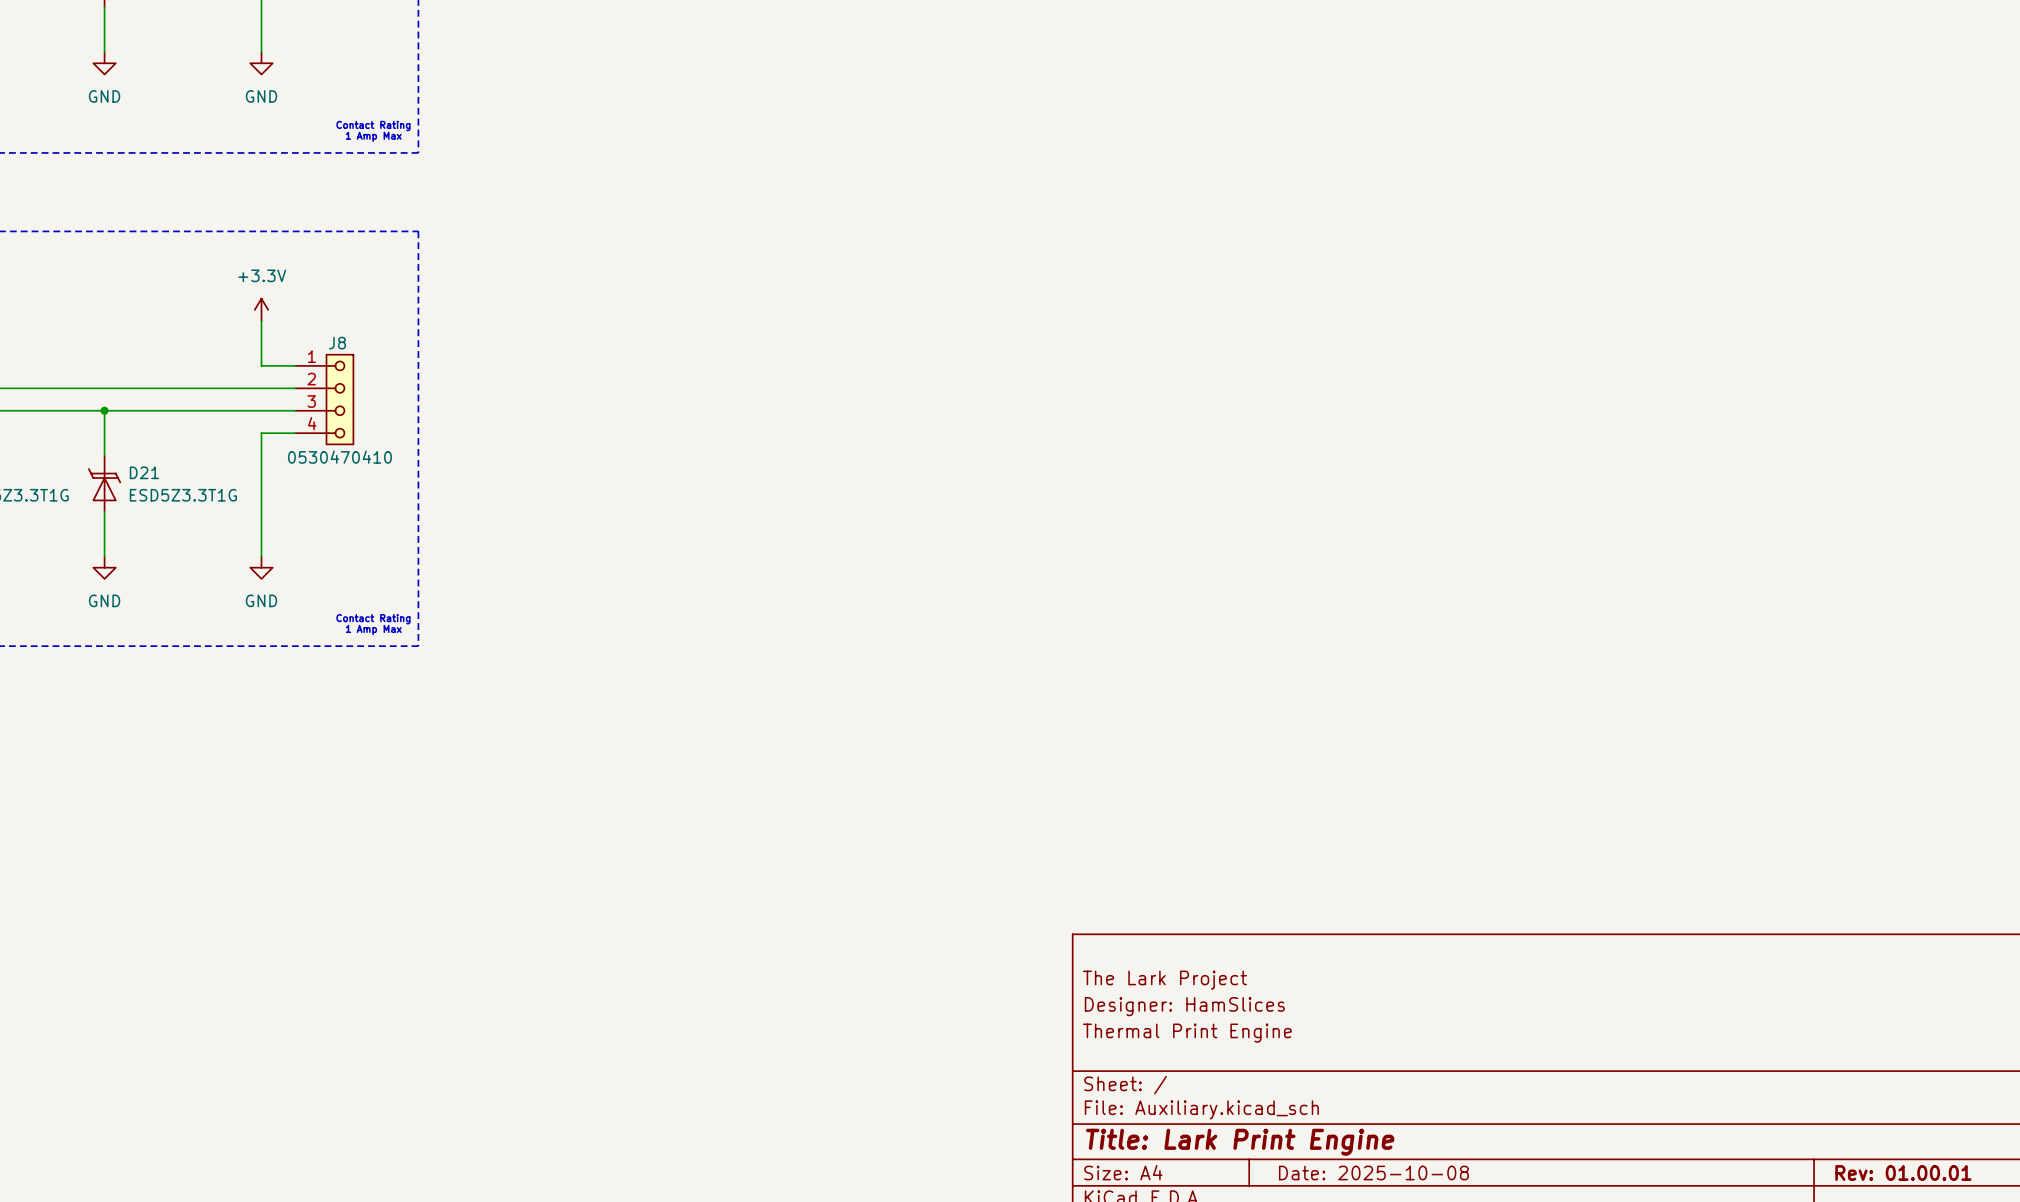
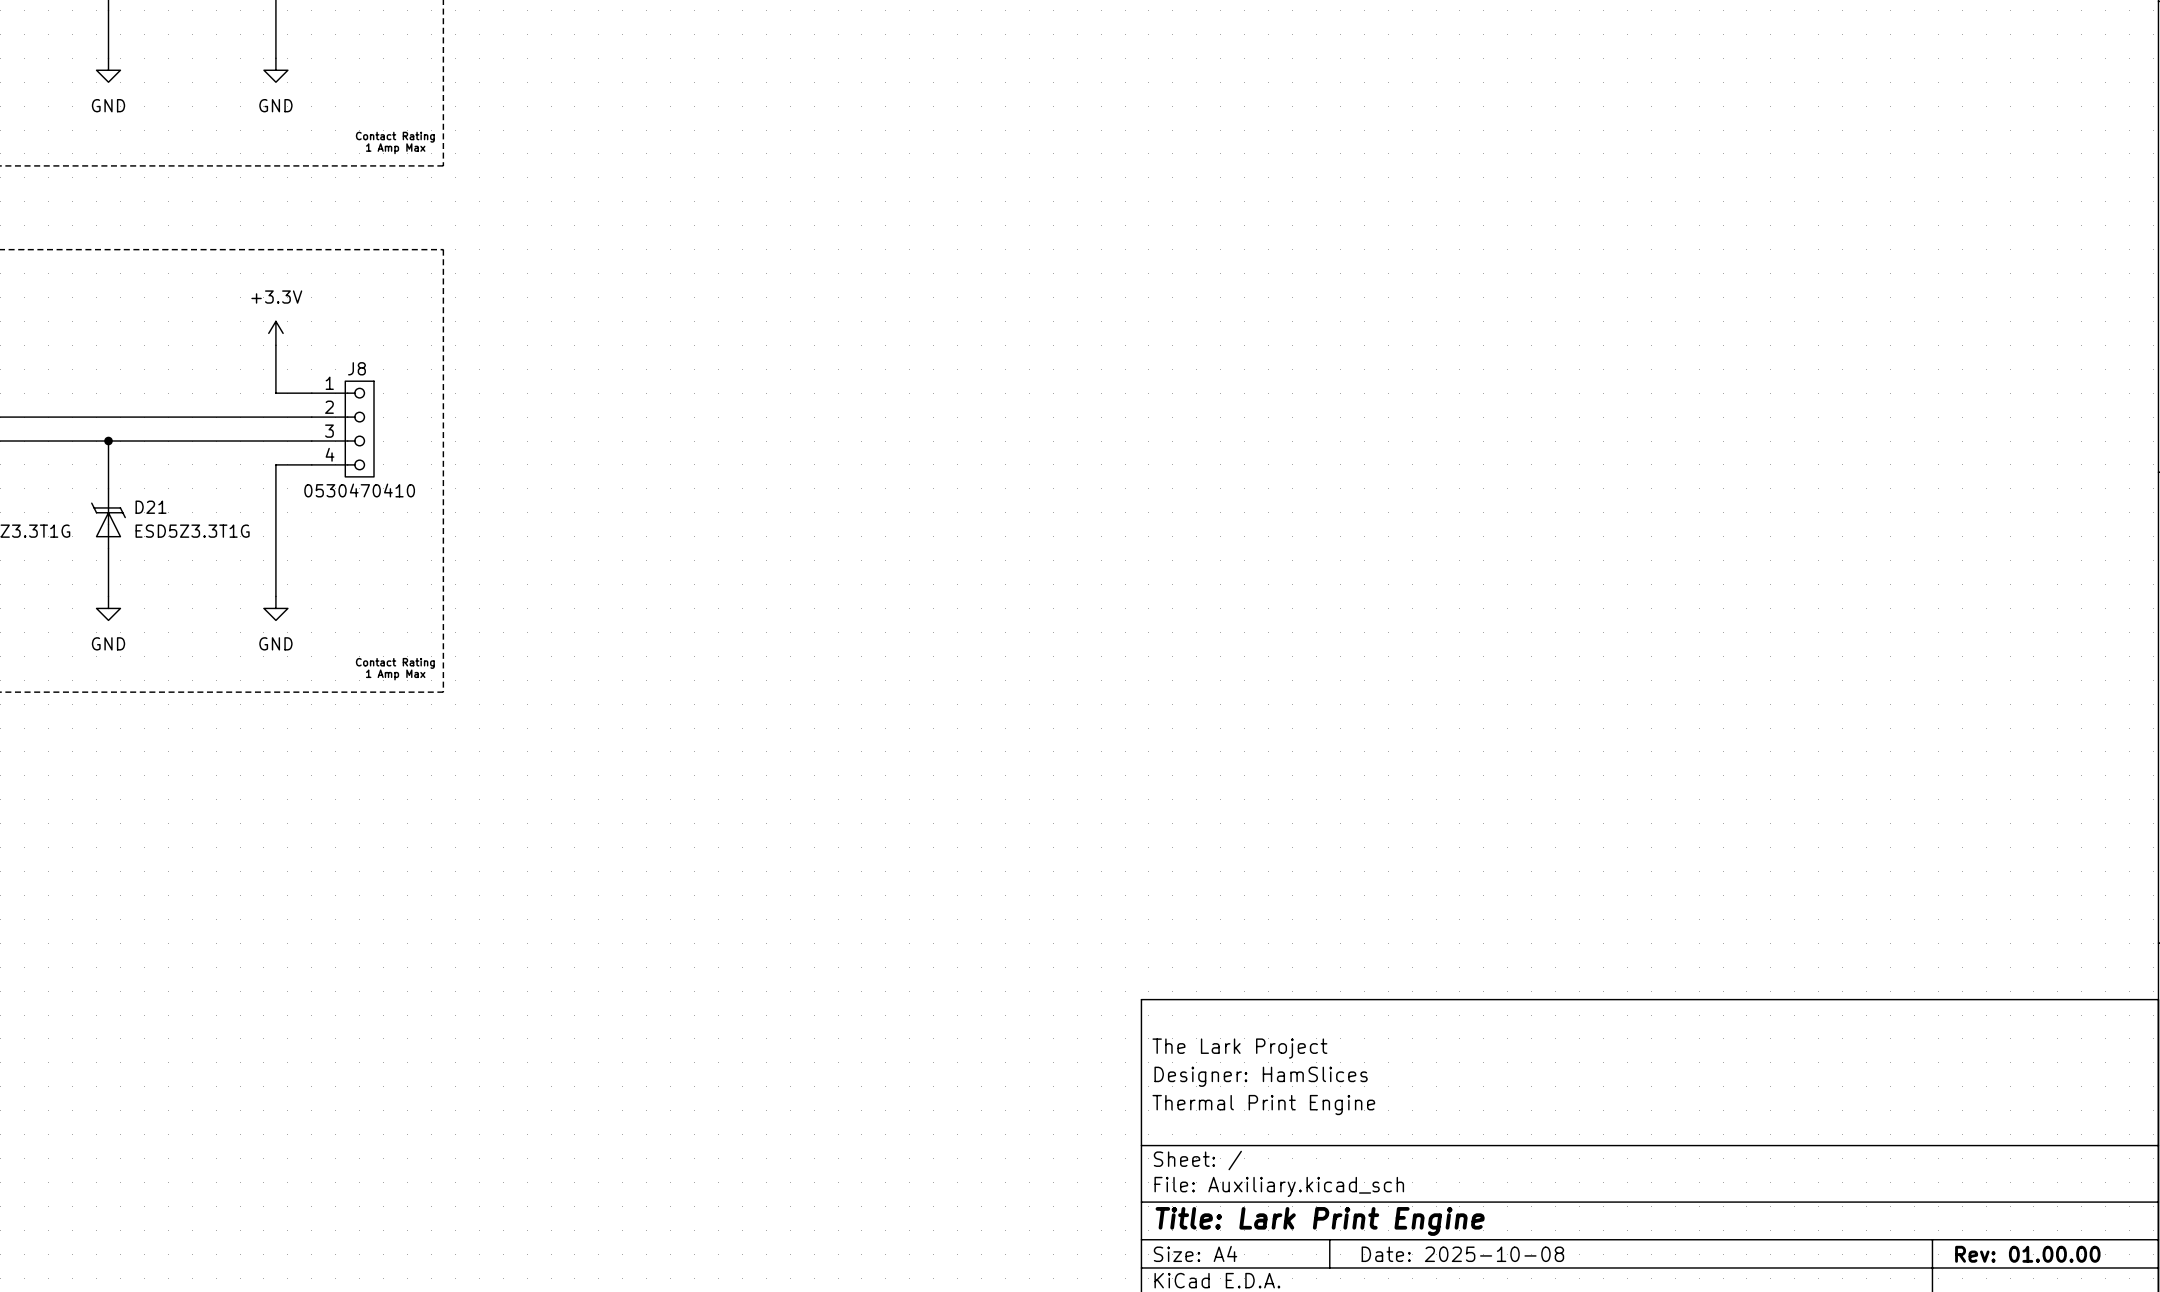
title block: Rev: 01.00.01 (1903, 1172) -> Rev: 01.00.00 (2027, 1254)

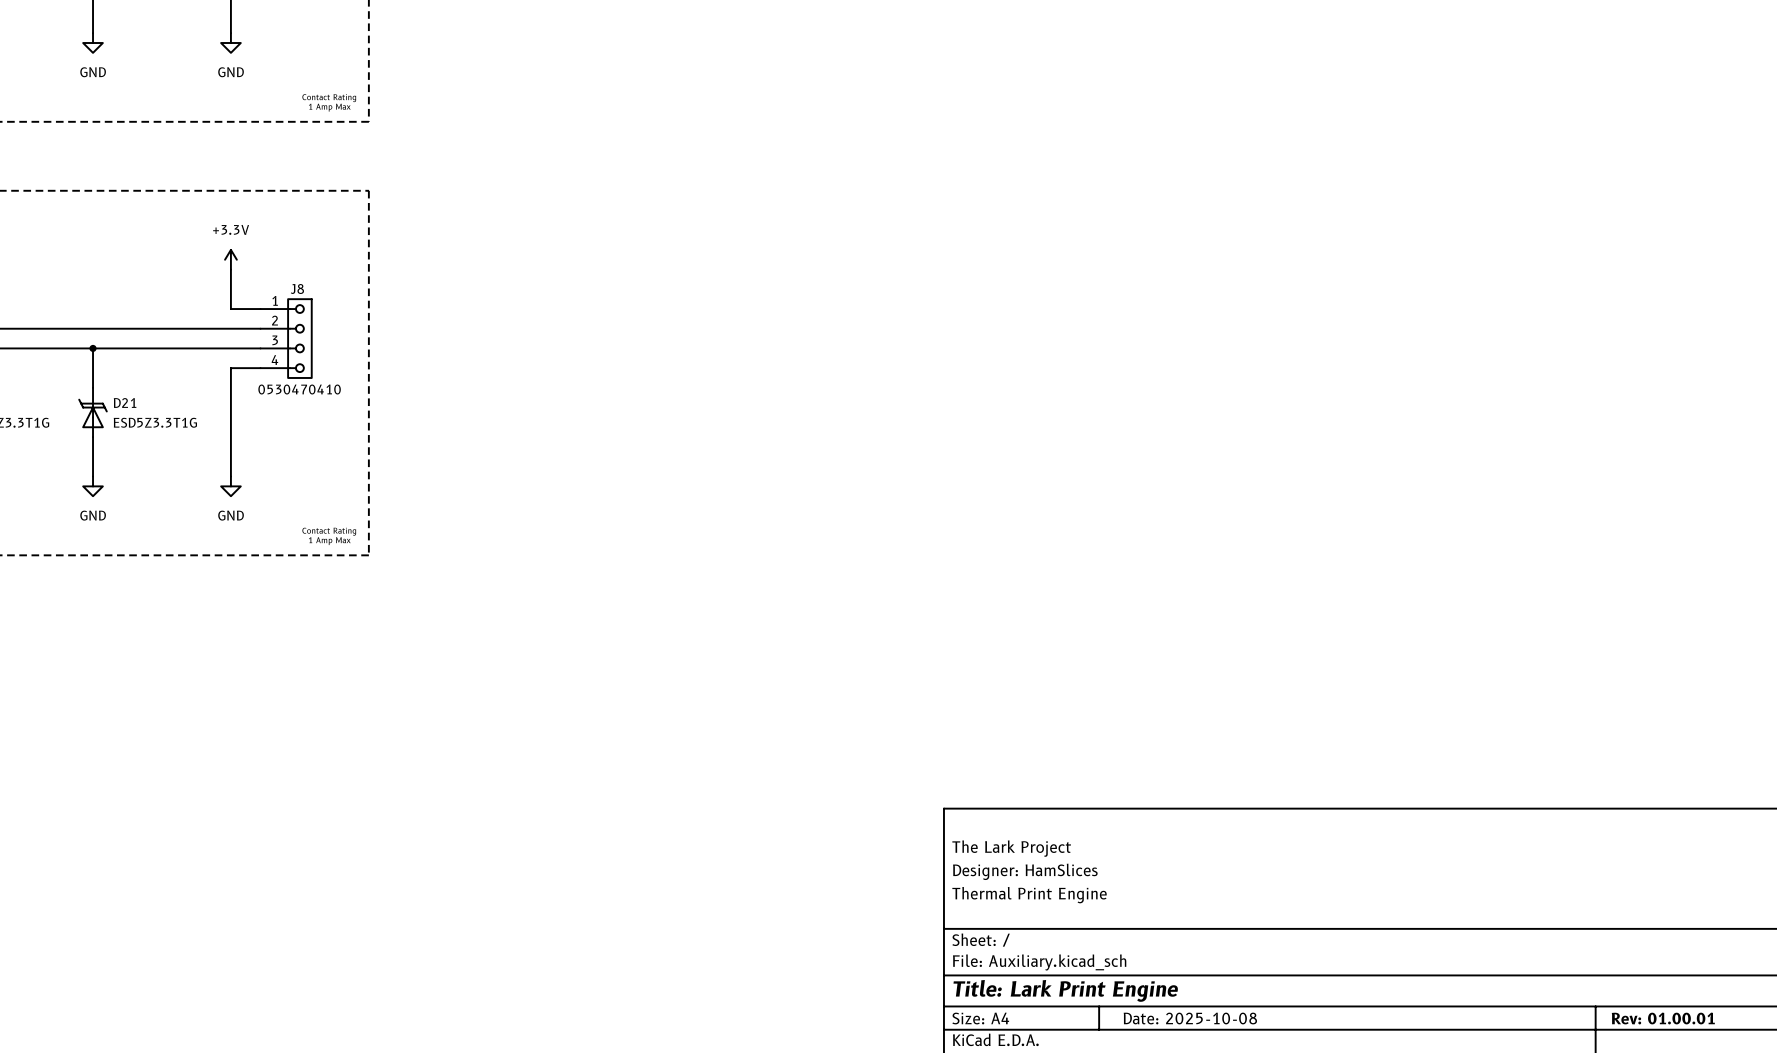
title block: Rev: 01.00.00 (2027, 1254) -> Rev: 01.00.01 (1663, 1018)

